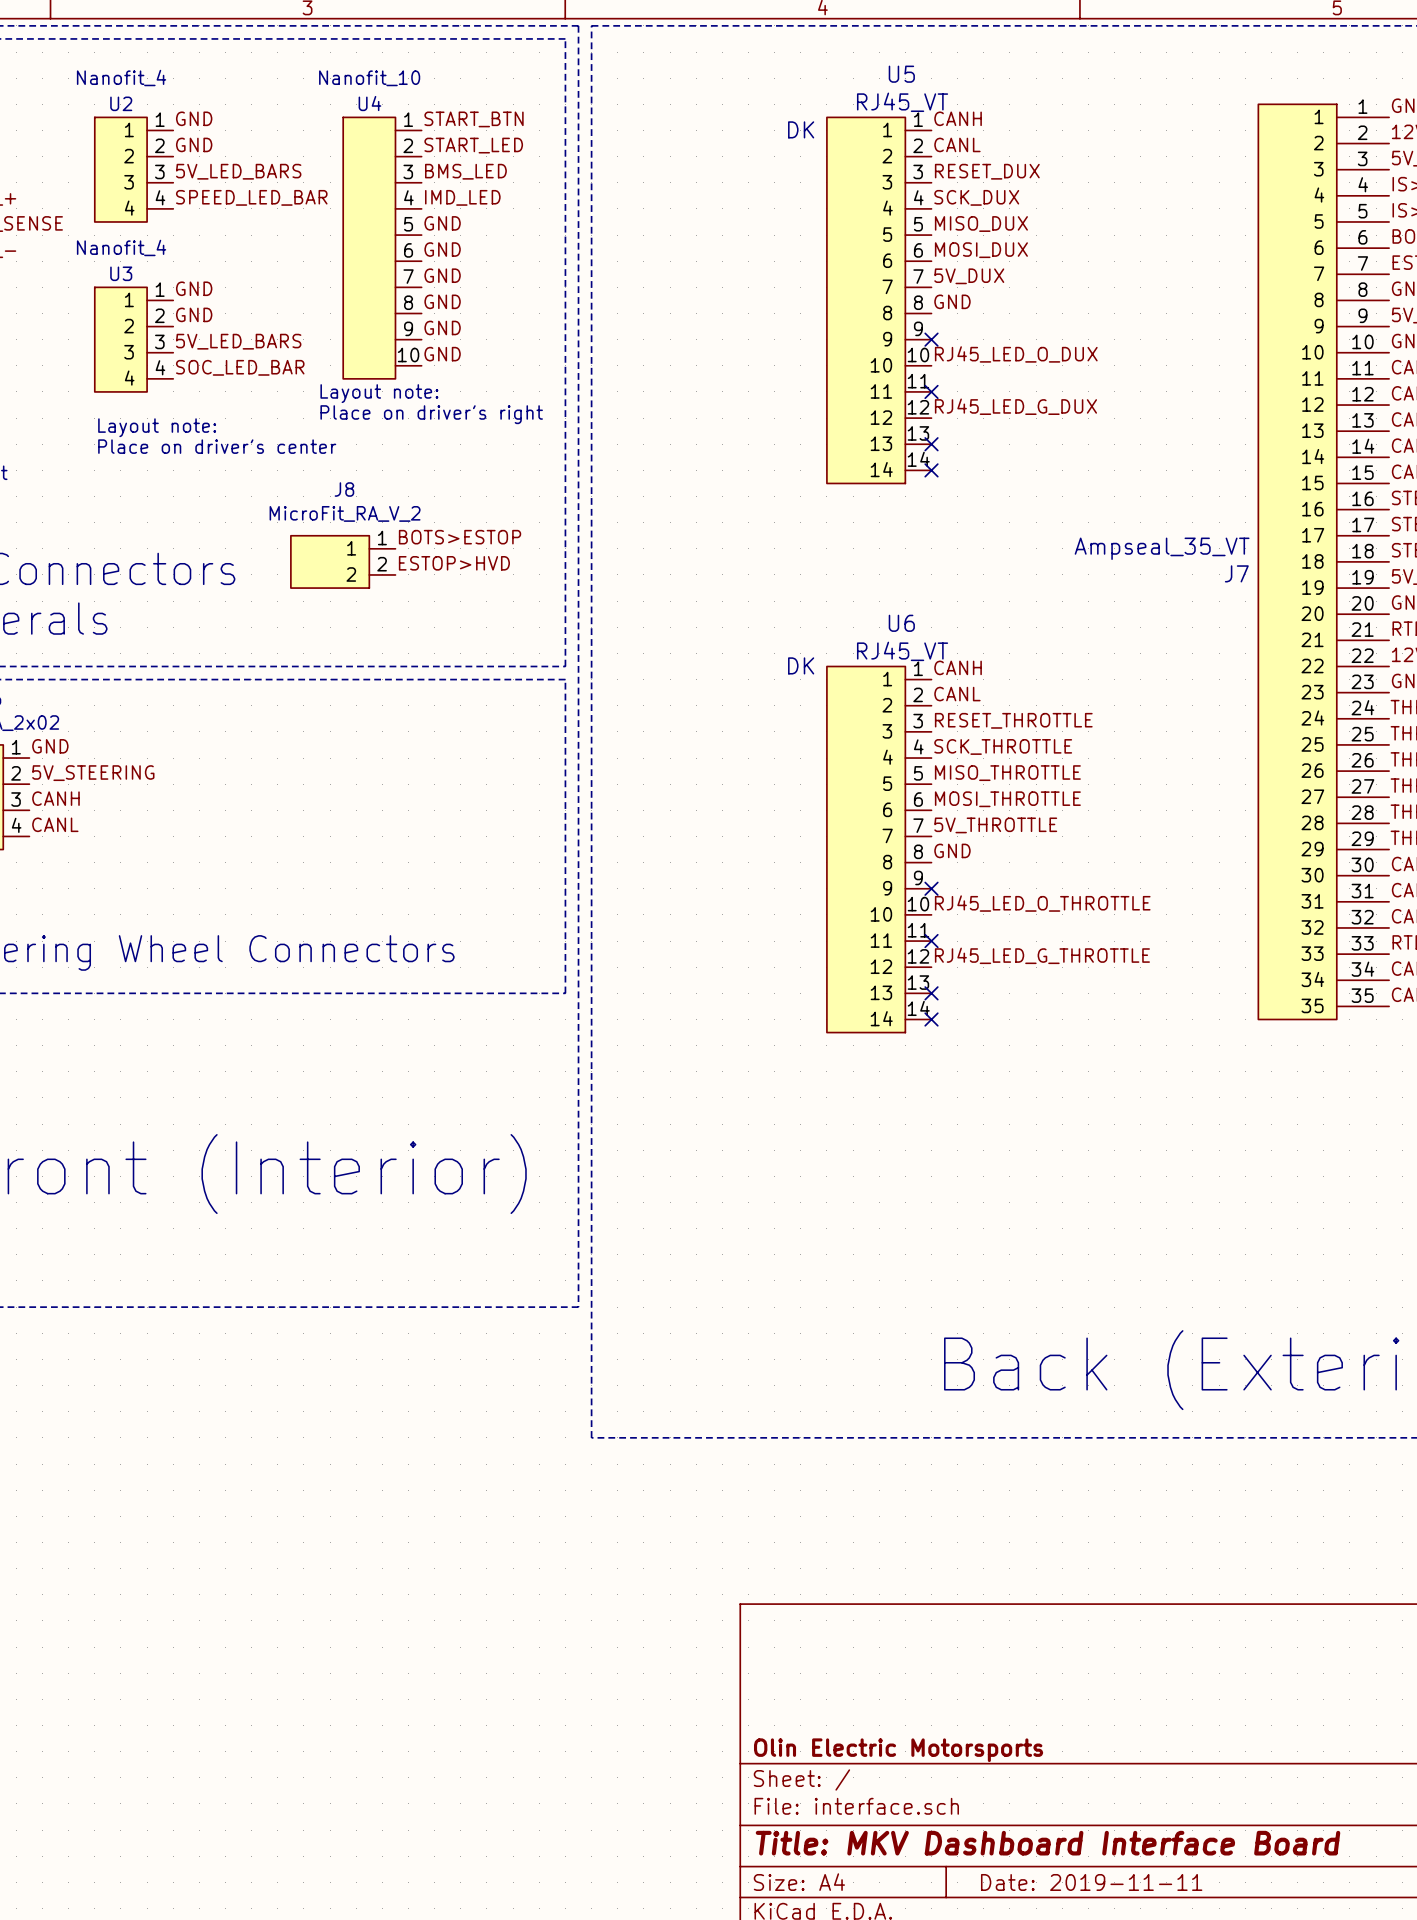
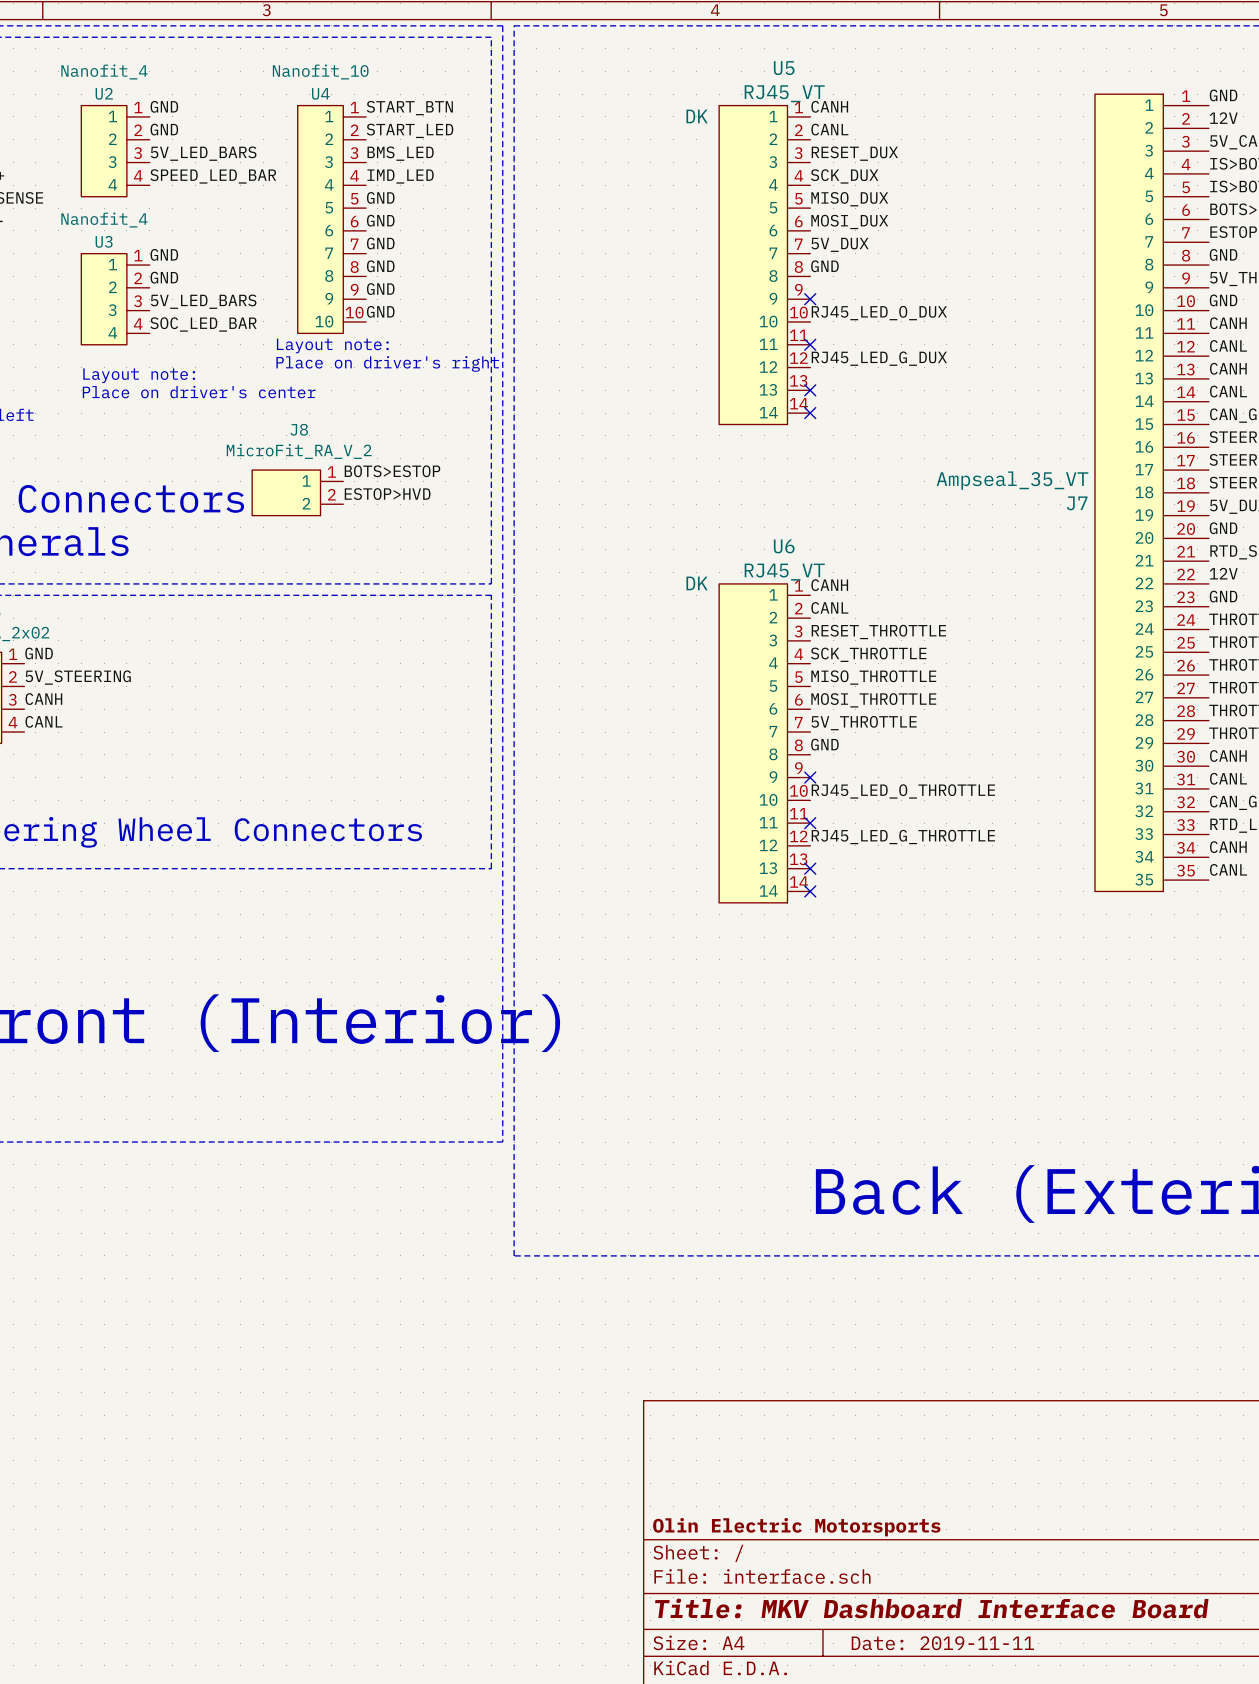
U4 symbol: [343, 117, 422, 379] -> [297, 105, 367, 334]

